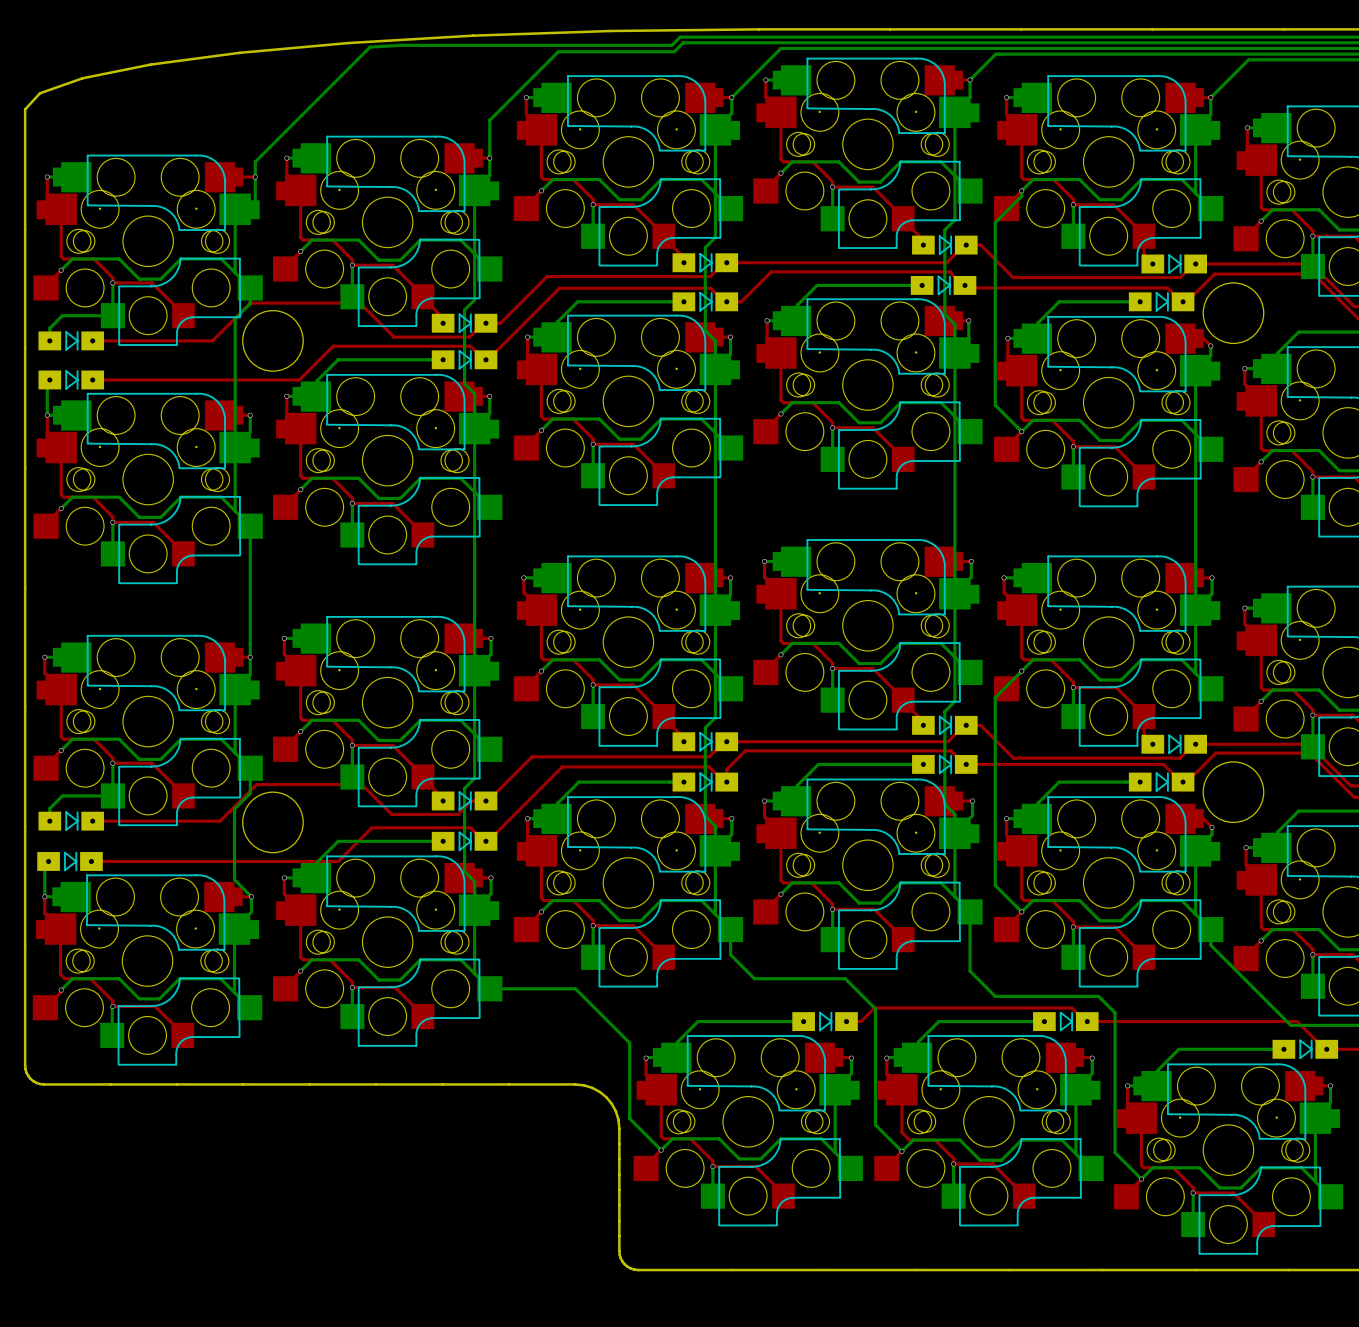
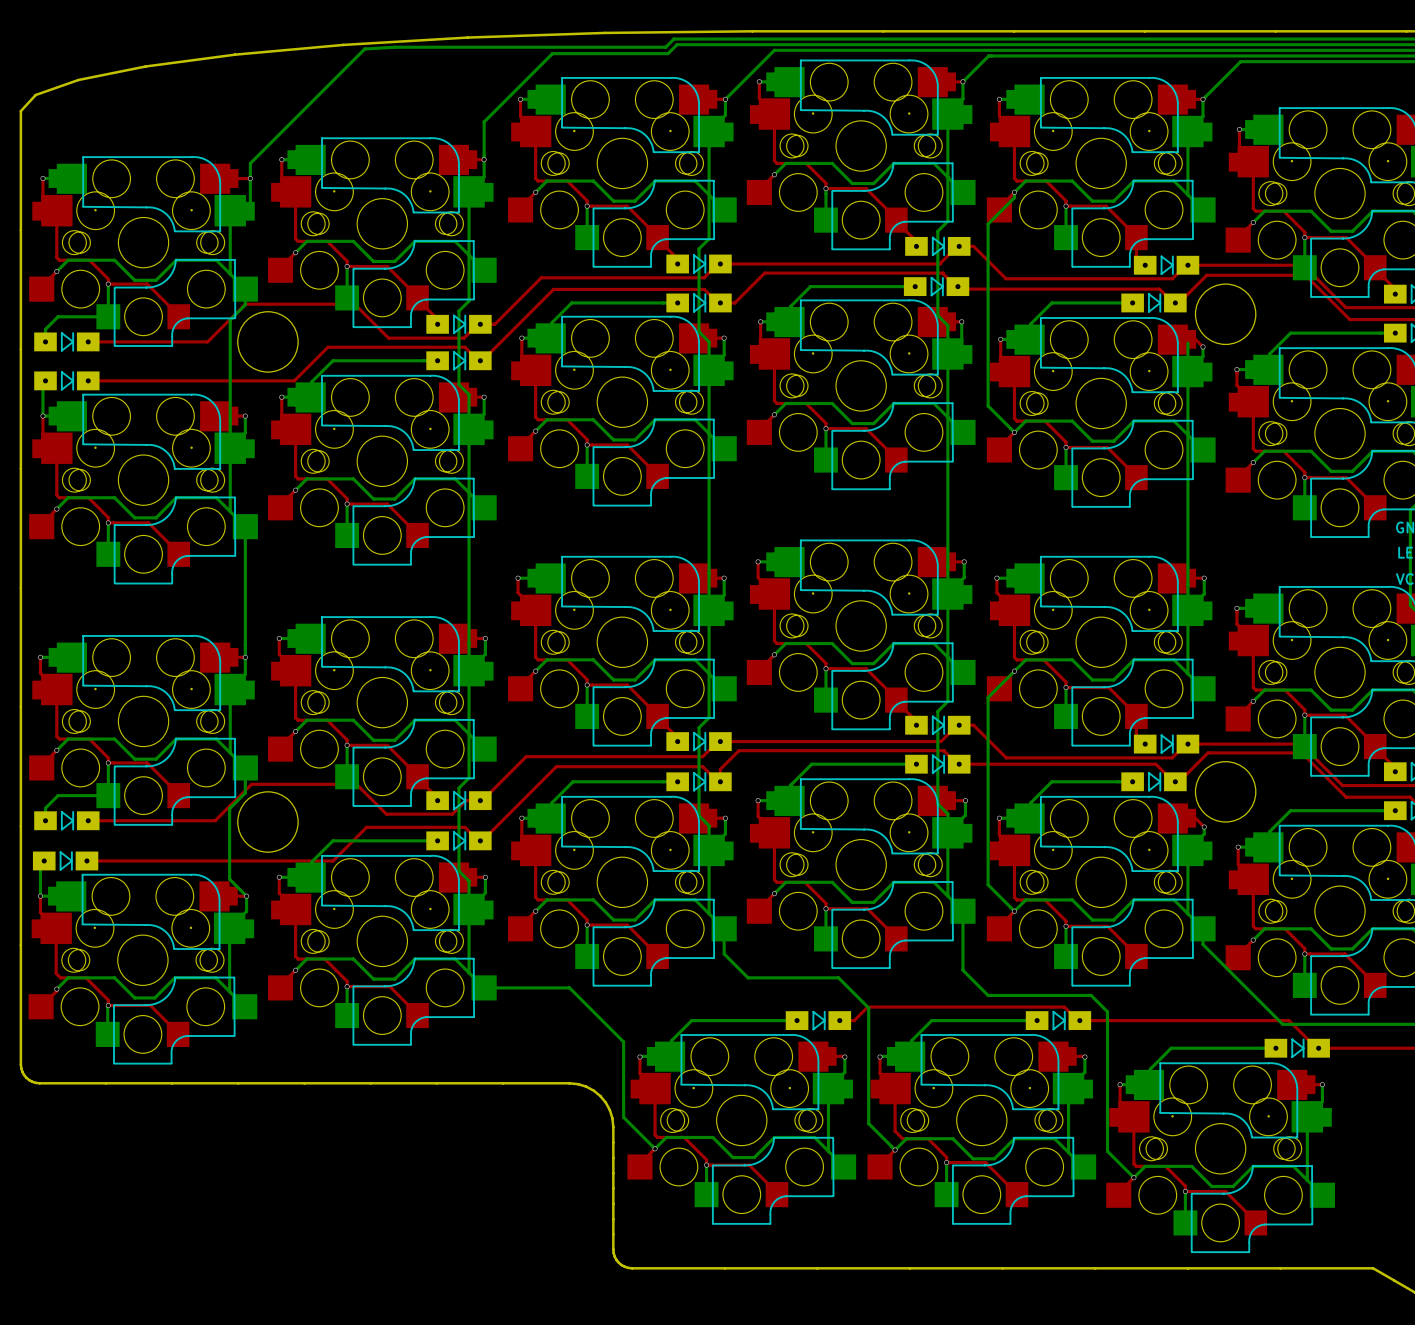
bottom track: none -> (1187, 343) (1187, 371)

